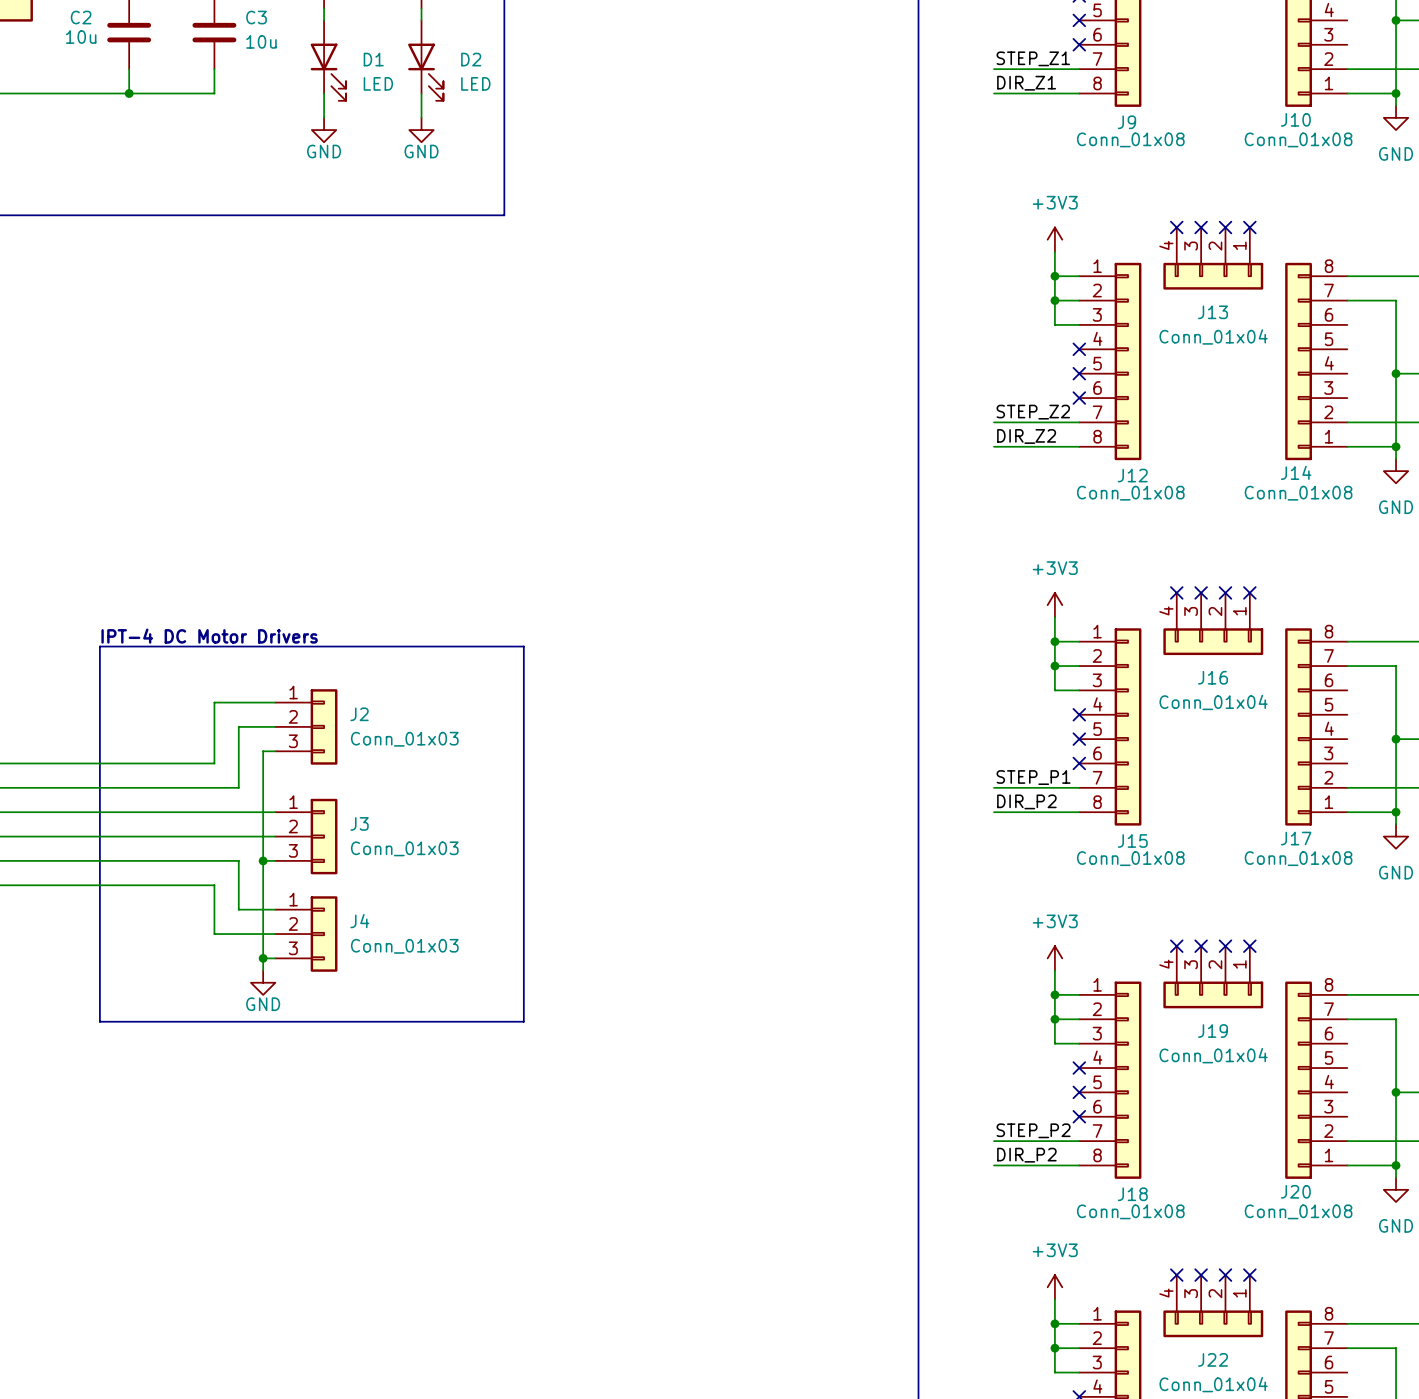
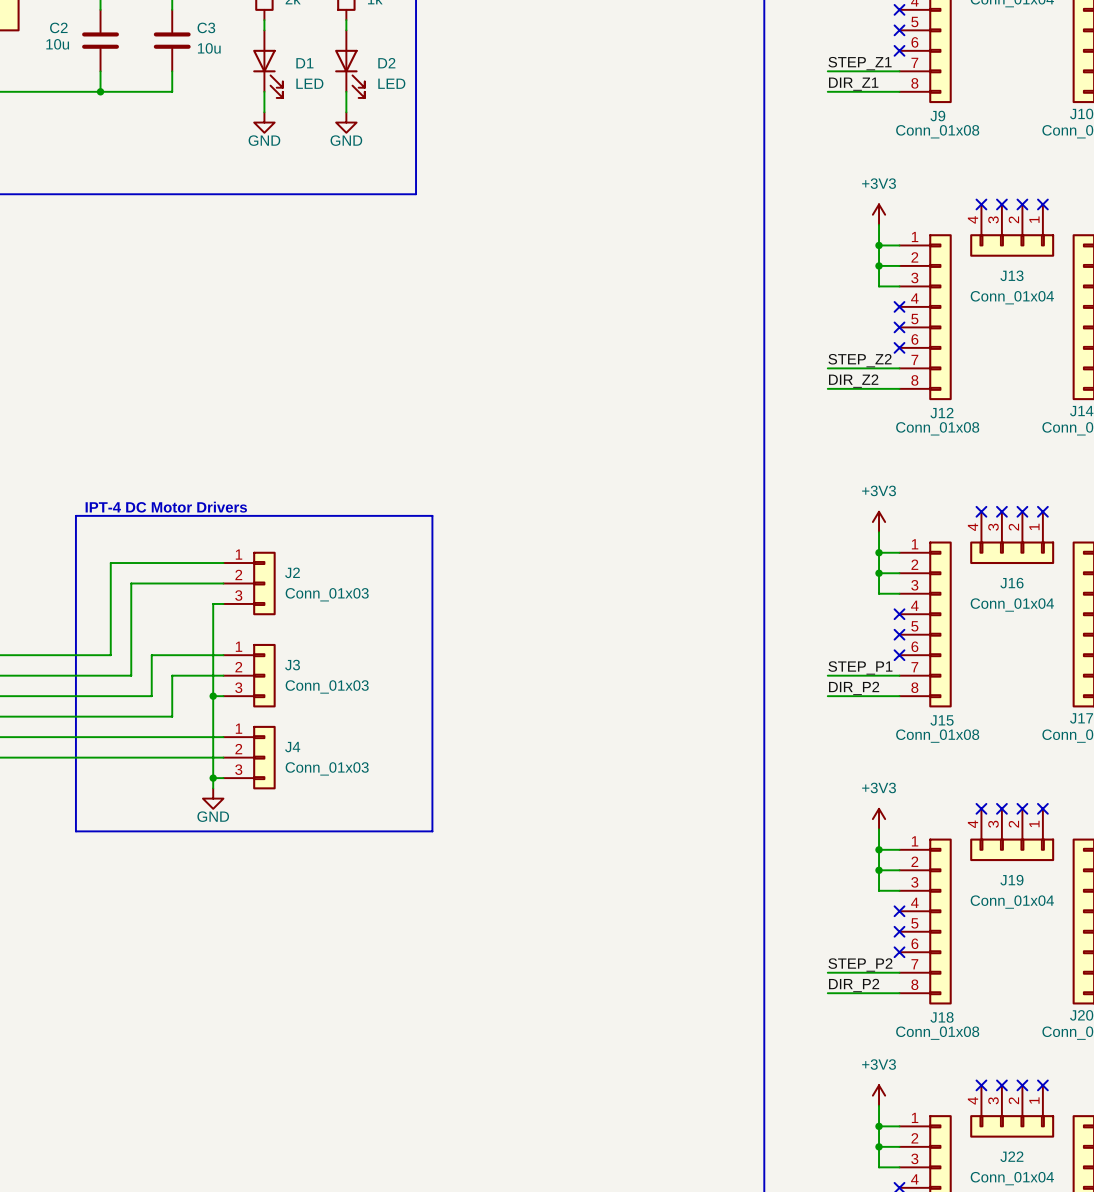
text position: IPT-4 DC Motor Drivers (209, 636) -> IPT-4 DC Motor Drivers (166, 507)
line: (99, 646) (523, 646) -> (75, 556) (75, 515) (432, 515) (432, 556)
wire: none -> (223, 563) (110, 563) (110, 655)
wire: none -> (223, 583) (131, 583) (131, 675)
wire: (263, 702) (214, 702) (214, 763) -> (223, 655) (172, 655)
wire: (275, 726) (238, 726) (238, 787) -> (223, 675) (192, 675)
J2 position: (306, 726) -> (249, 583)
wire: (263, 751) (275, 751) -> (213, 644) (213, 603)
wire: (141, 763) (190, 763) -> (151, 696) (151, 655)
wire: (165, 787) (214, 787) -> (172, 716) (172, 675)
wire: (190, 812) (263, 812) -> none
junction: none -> (213, 696)
wire: (214, 836) (275, 836) -> none
J3 position: (306, 836) -> (249, 675)
wire: (238, 860) (238, 909) (263, 909) -> (192, 737) (213, 737)
junction: (263, 860) -> none
wire: (214, 885) (214, 934) (275, 934) -> (172, 757) (223, 757)
junction: none -> (213, 778)
wire: (263, 921) (263, 970) -> none
J4 position: (306, 934) -> (249, 757)
wire: (263, 958) (275, 958) -> none
junction: (263, 958) -> none
line: (99, 973) (99, 1021) (523, 1021) (523, 973) -> (75, 831) (432, 831)
power symbol position: GND (263, 982) -> GND (213, 798)

